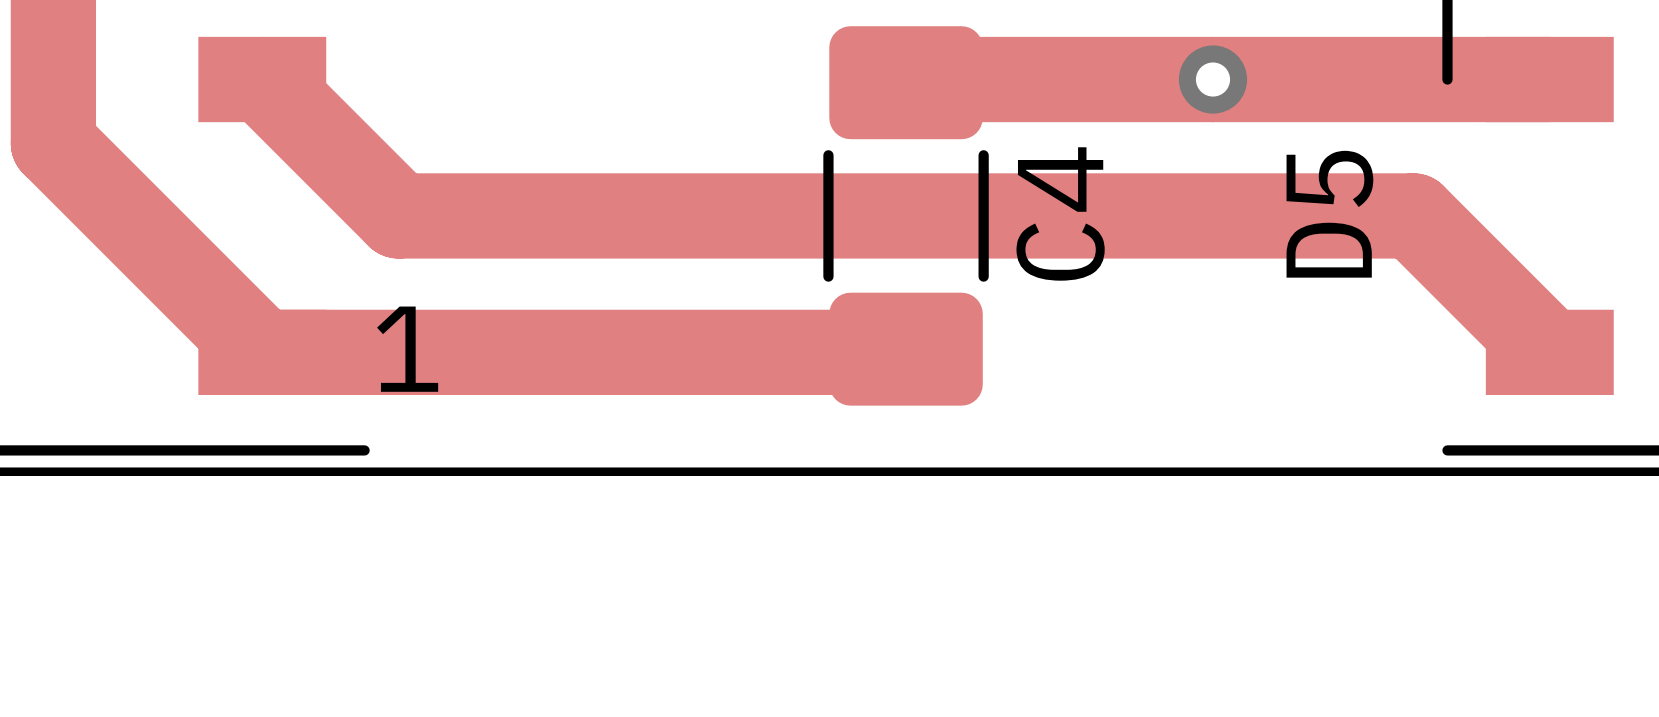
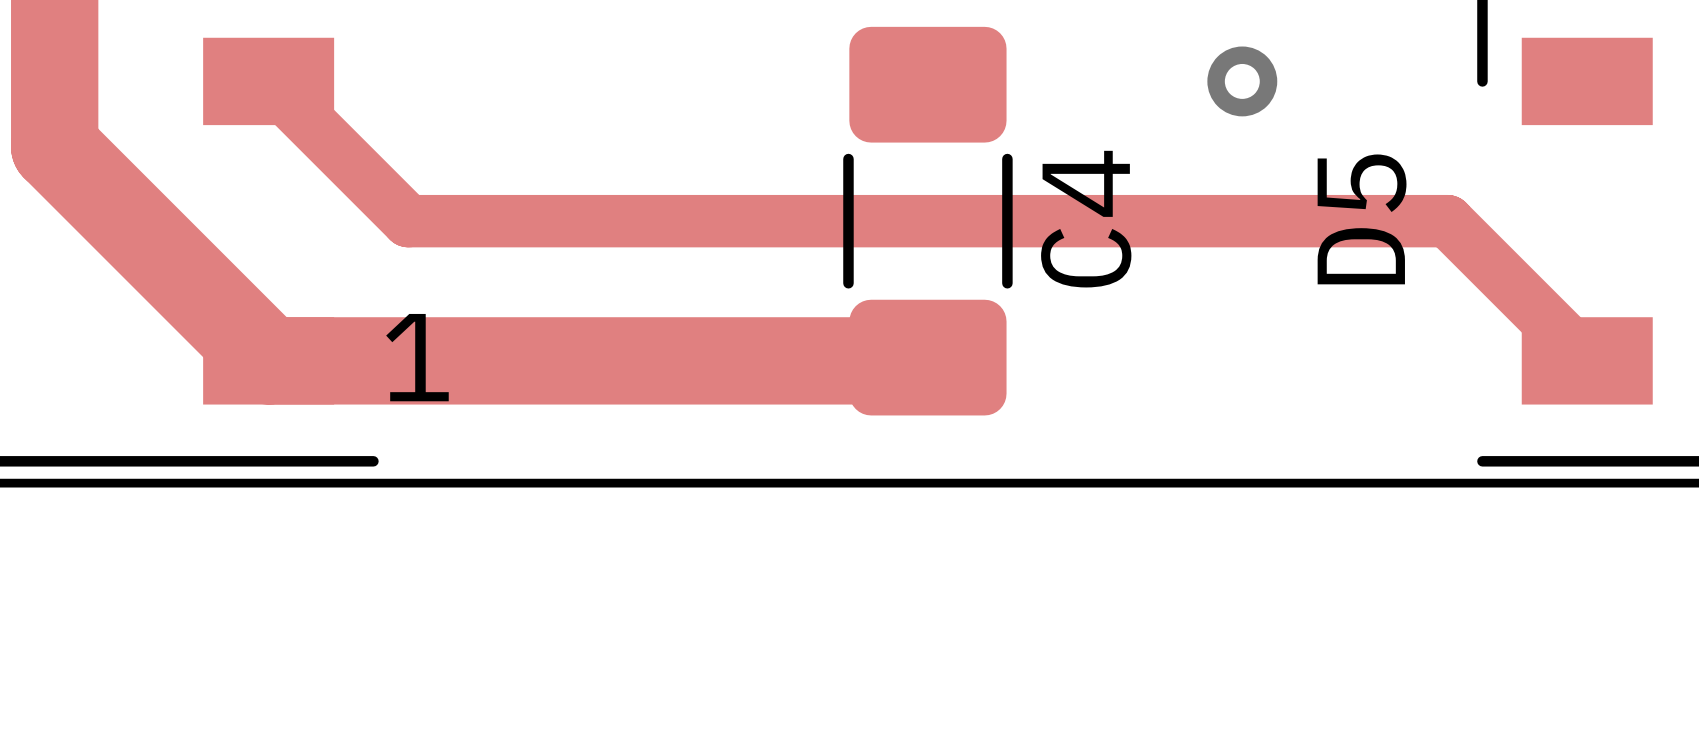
track width: thick (262, 79) (398, 215) (1413, 215) (1549, 352) -> thin (268, 81) (408, 221) (1447, 221) (1587, 360)
track: (909, 79) (1549, 79) -> none

